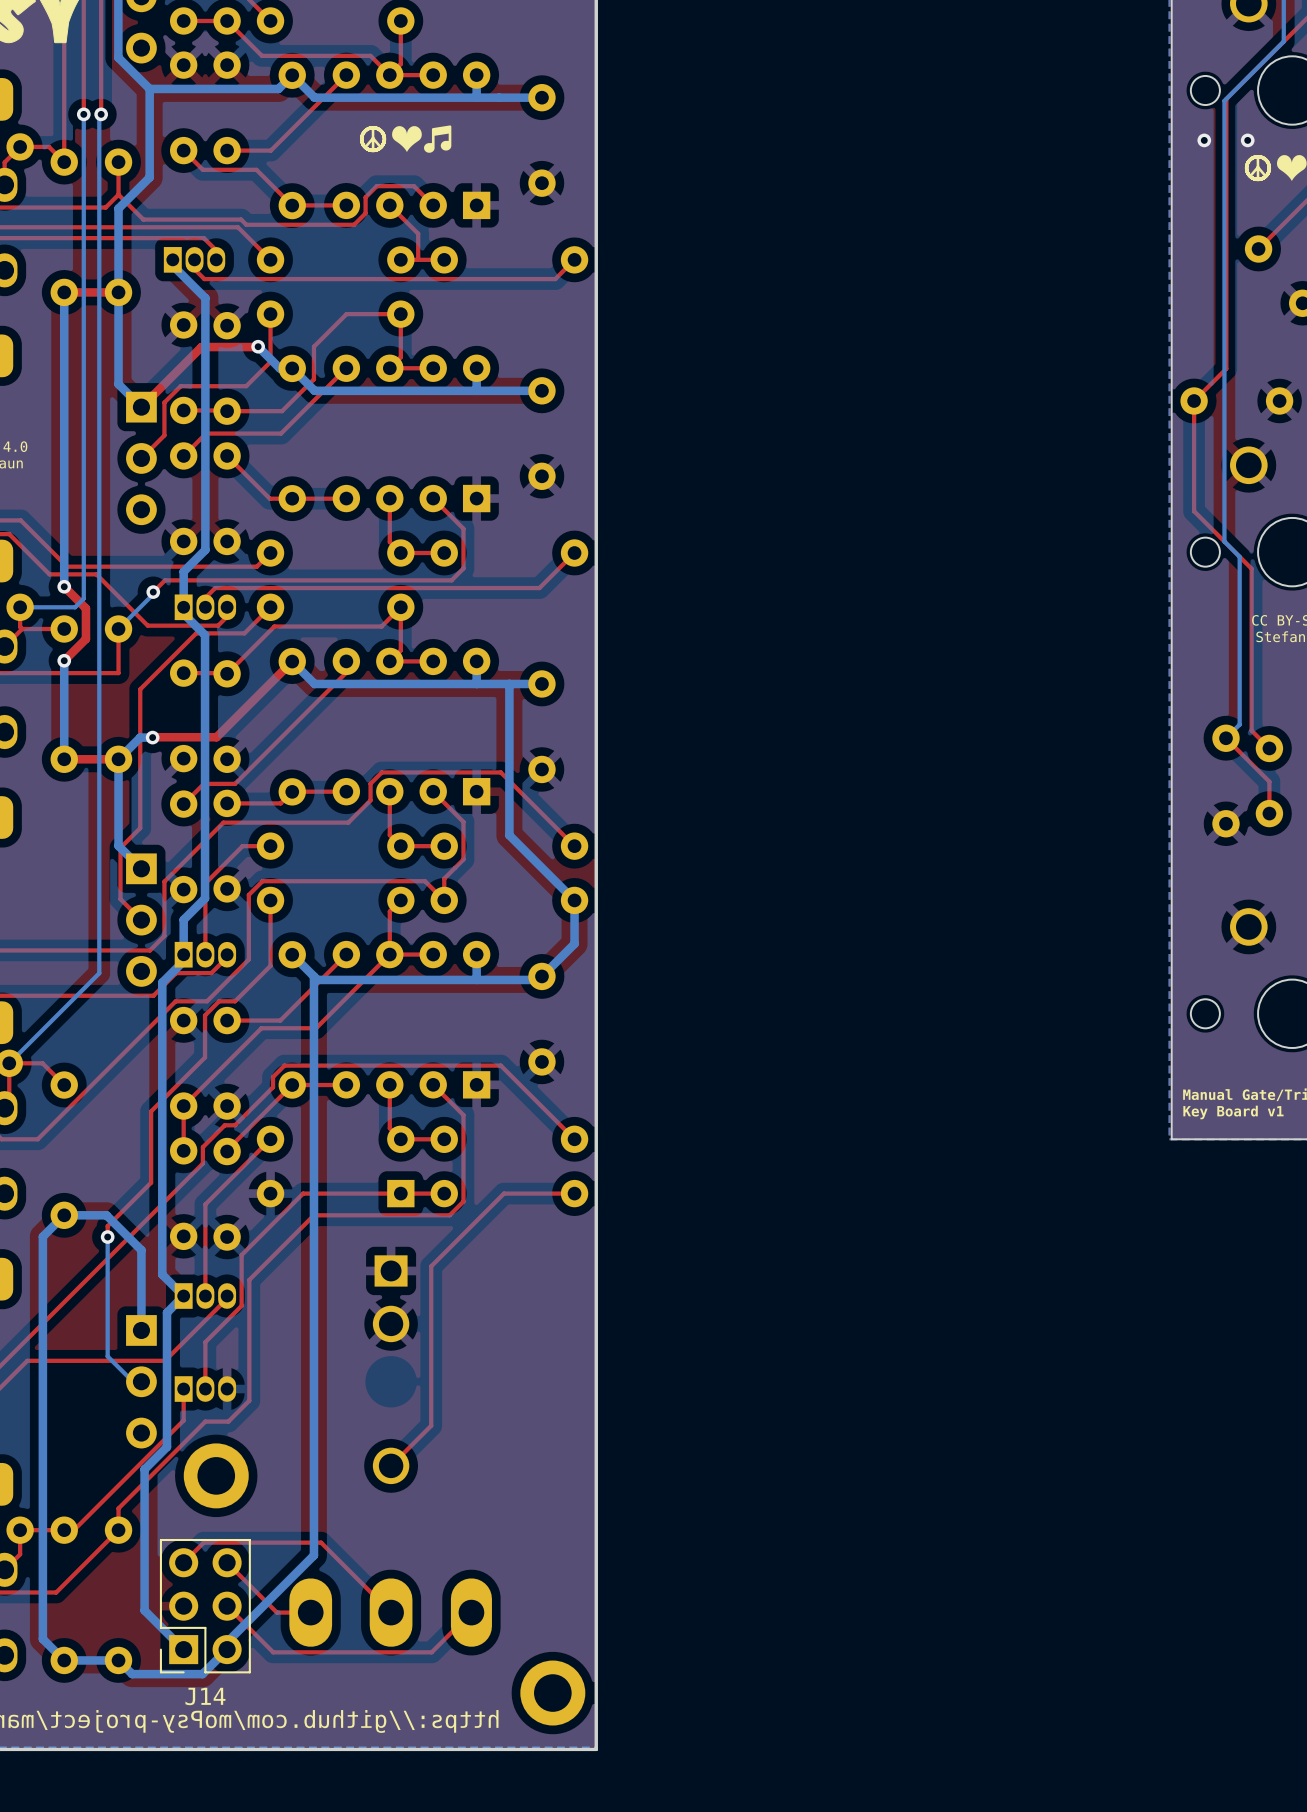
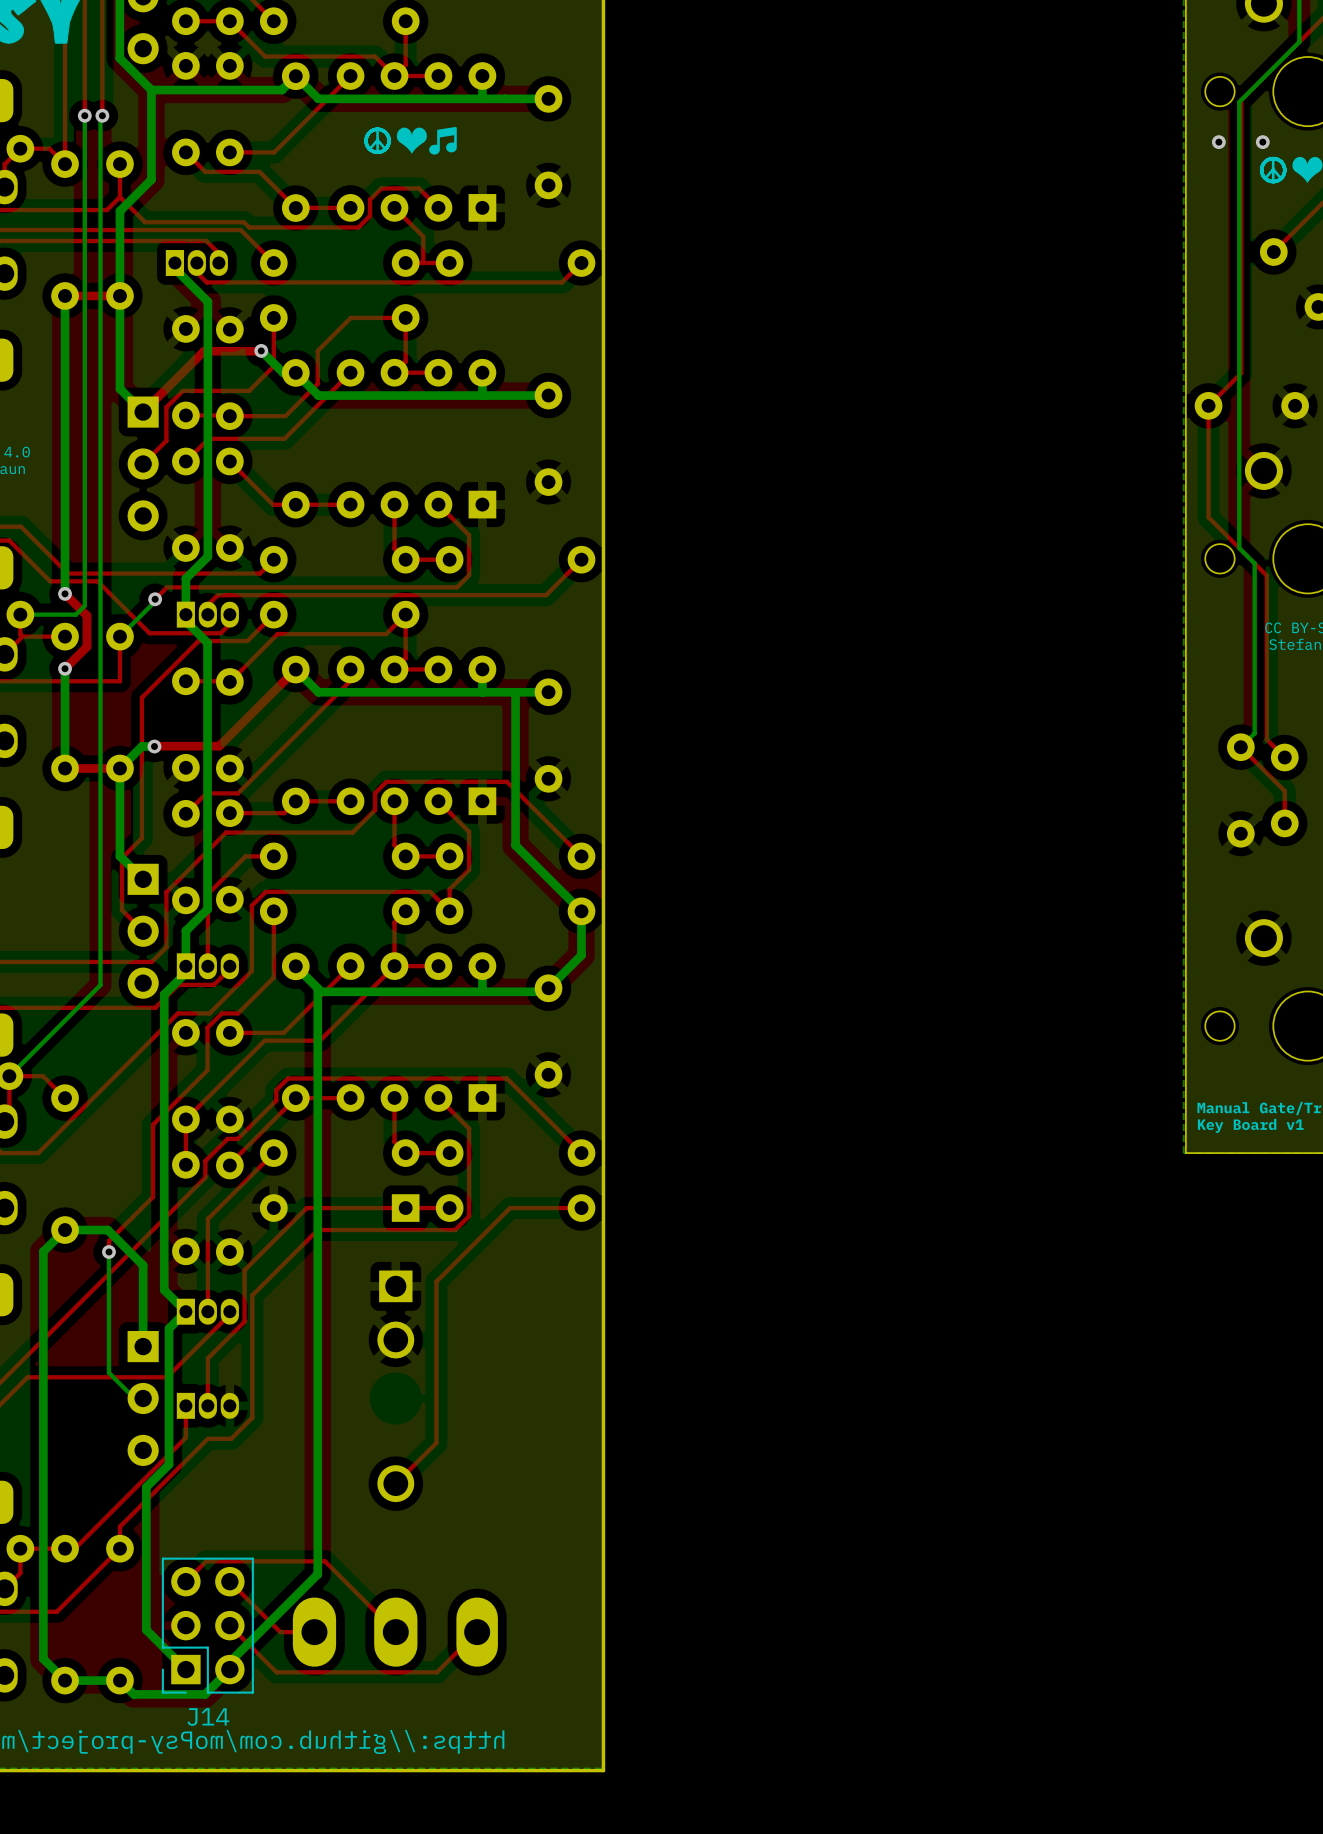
part: (216, 1475) -> none
part: (552, 1693) -> none

